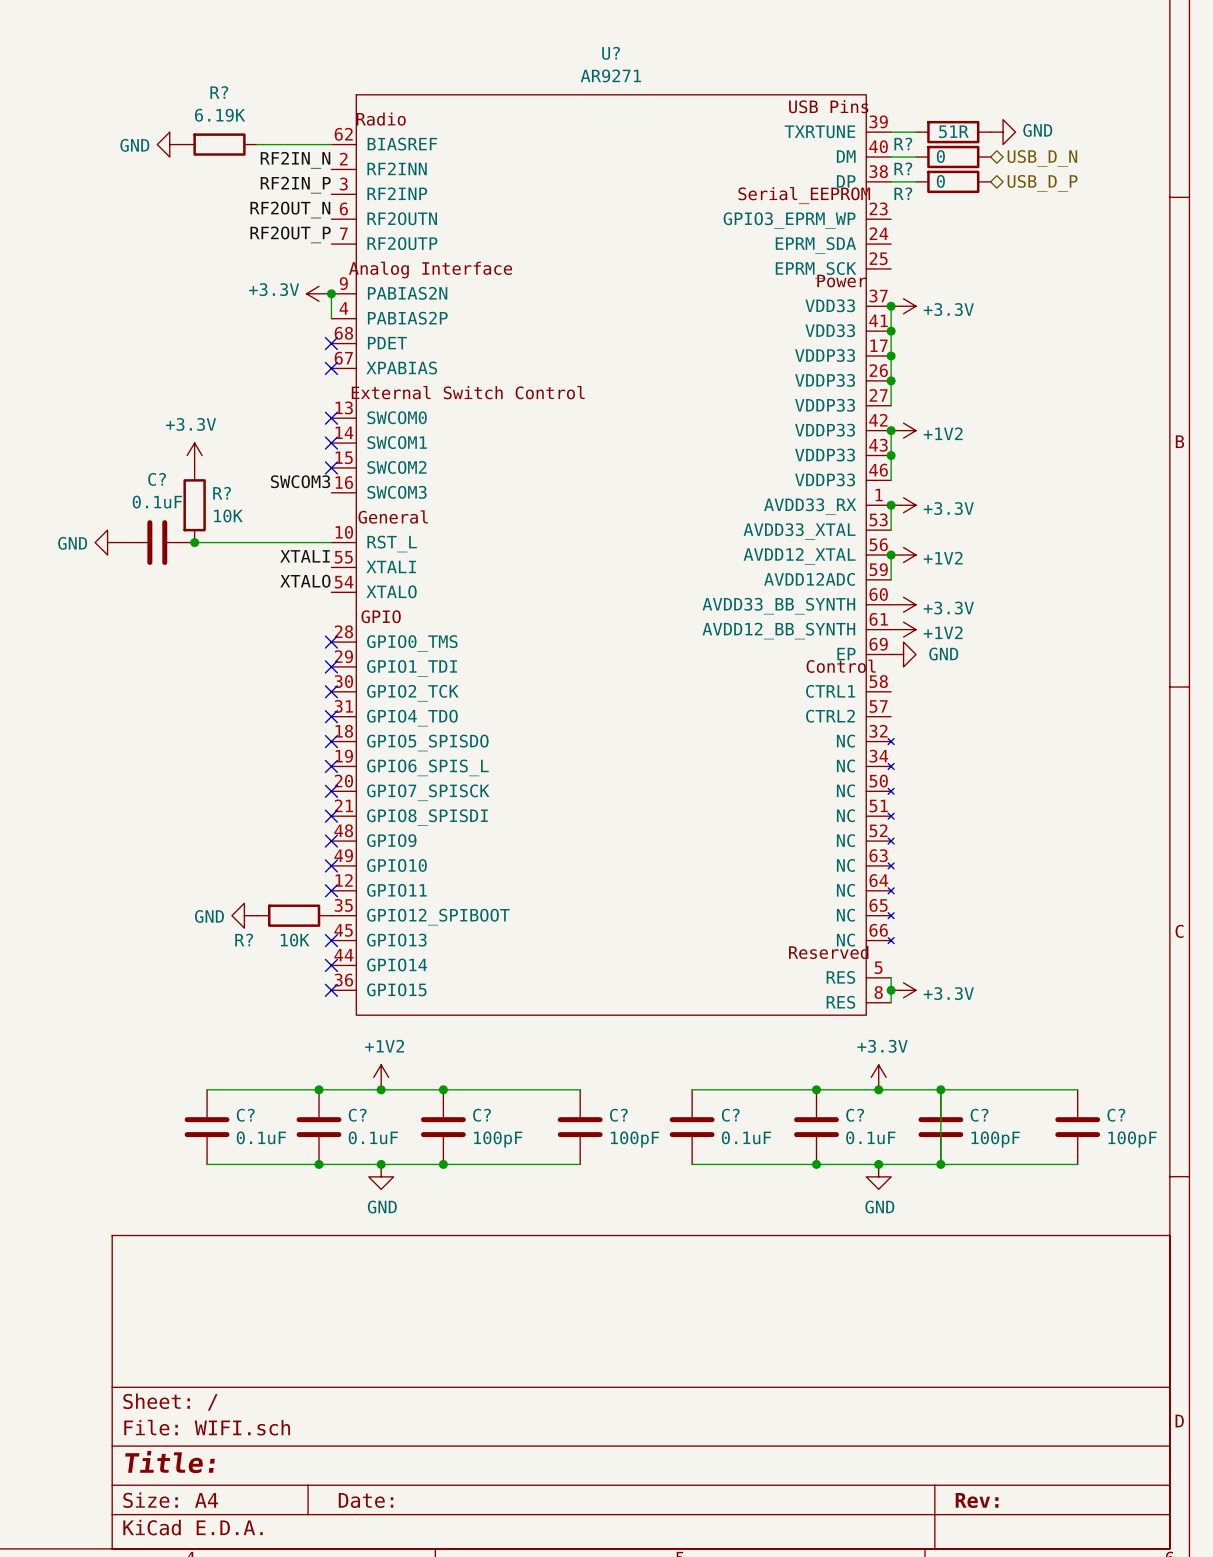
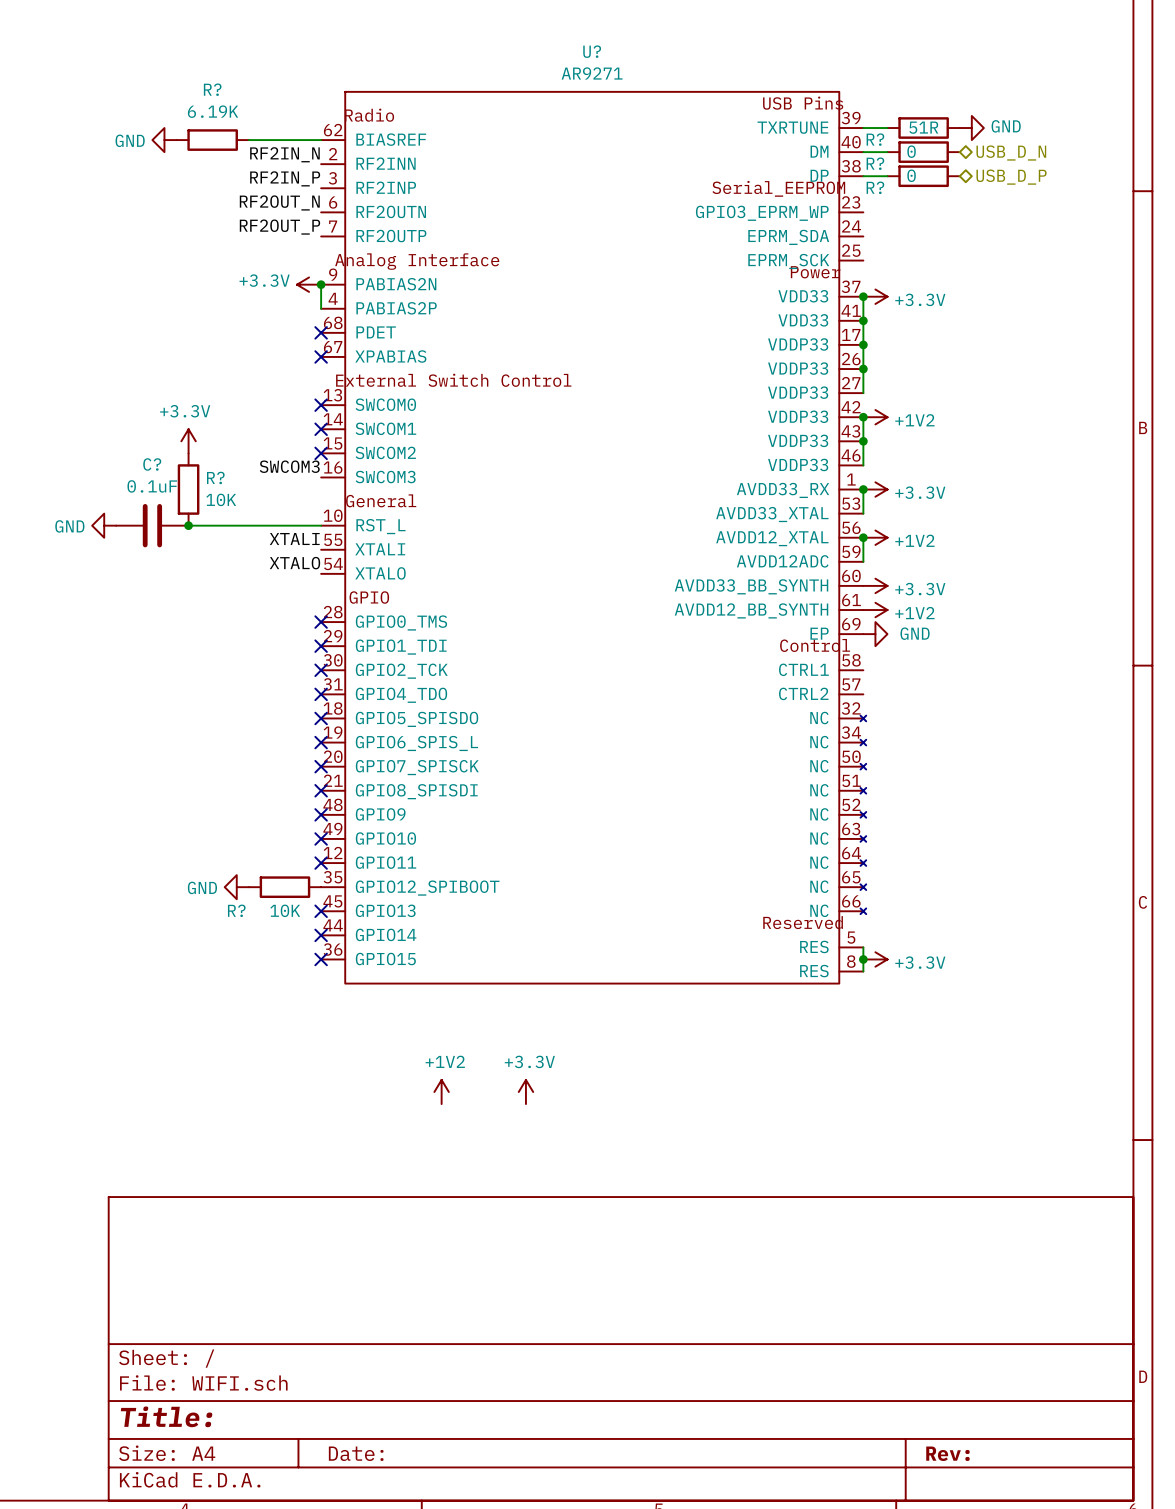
power symbol position: +1V2 (381, 1077) -> +1V2 (441, 1092)
power symbol: +3.3V (878, 1077) -> none
wire: (207, 1089) (580, 1089) -> none
junction: (319, 1089) -> none
junction: (381, 1089) -> none
junction: (443, 1089) -> none
wire: (692, 1089) (1077, 1089) -> none
junction: (816, 1089) -> none
junction: (878, 1089) -> none
wire: (940, 1089) (940, 1164) -> none
junction: (940, 1089) -> none
C?: 0.1uF (207, 1127) -> none
C?: 0.1uF (319, 1127) -> none
C?: 100pF (443, 1127) -> none
power symbol: none -> +3.3V (525, 1092)
C?: 100pF (580, 1127) -> none
C?: 0.1uF (692, 1127) -> none
C?: 0.1uF (816, 1127) -> none
C?: 100pF (940, 1127) -> none
C?: 100pF (1077, 1127) -> none
wire: (207, 1164) (580, 1164) -> none
junction: (319, 1164) -> none
junction: (381, 1164) -> none
junction: (443, 1164) -> none
wire: (692, 1164) (1077, 1164) -> none
junction: (816, 1164) -> none
junction: (878, 1164) -> none
junction: (940, 1164) -> none
power symbol: GND (381, 1176) -> none
power symbol: GND (878, 1176) -> none

